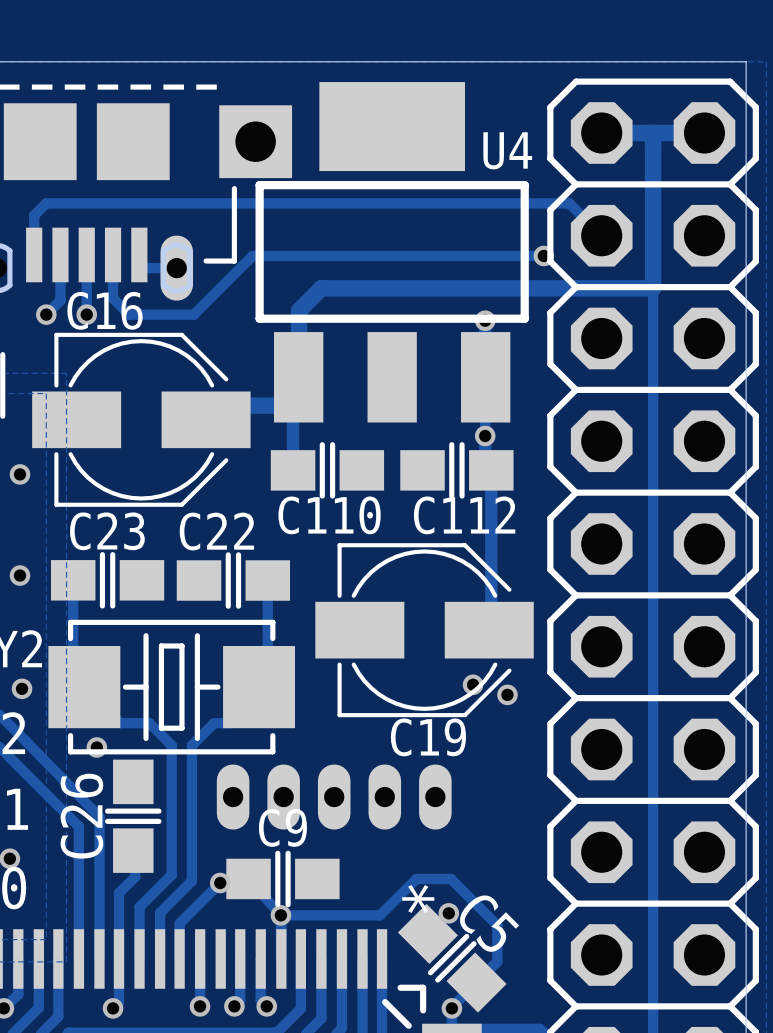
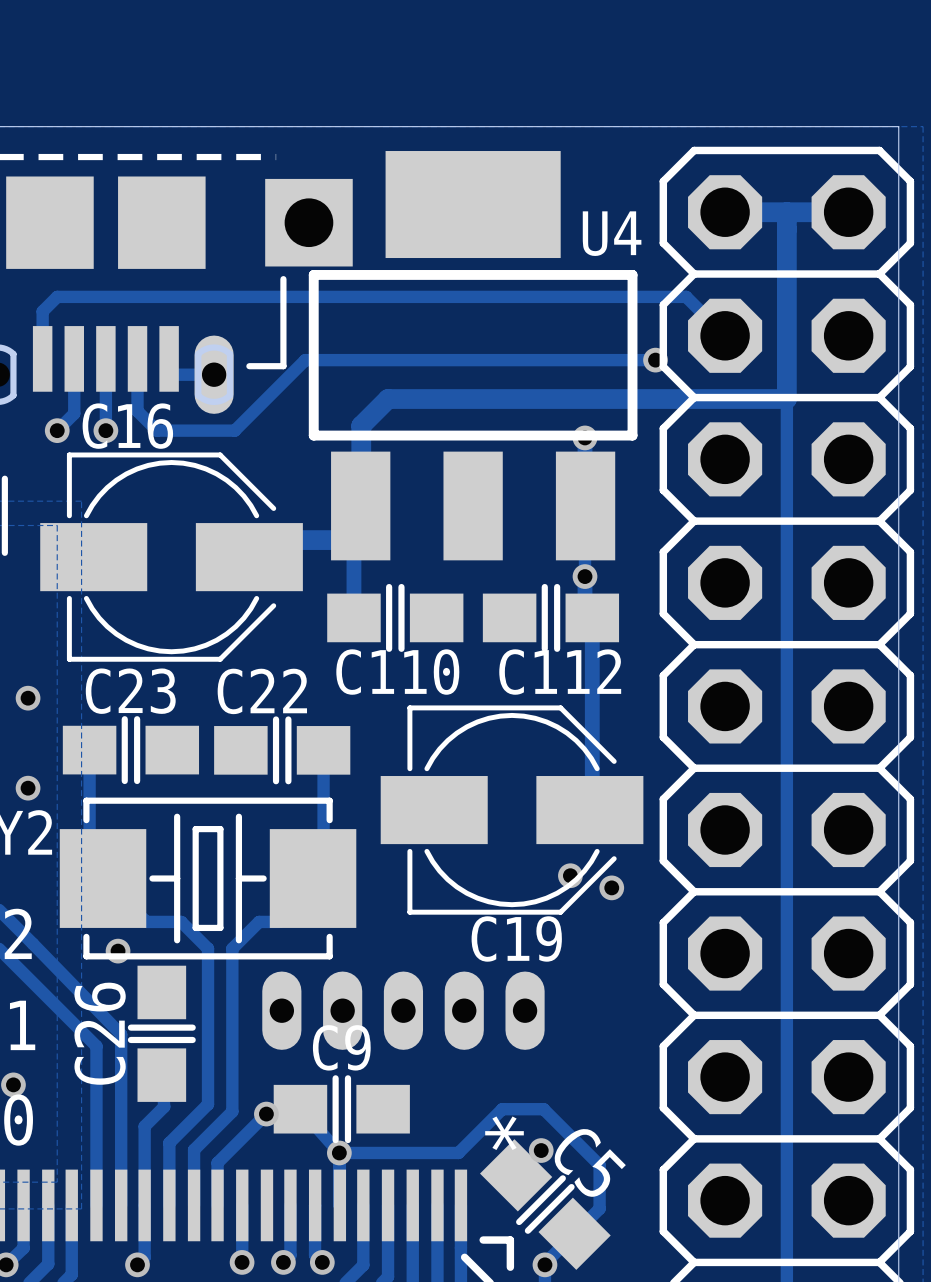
via: (20, 474) -> none
via: none -> (28, 698)
via: (20, 575) -> none
via: none -> (28, 788)
via: (22, 688) -> none

